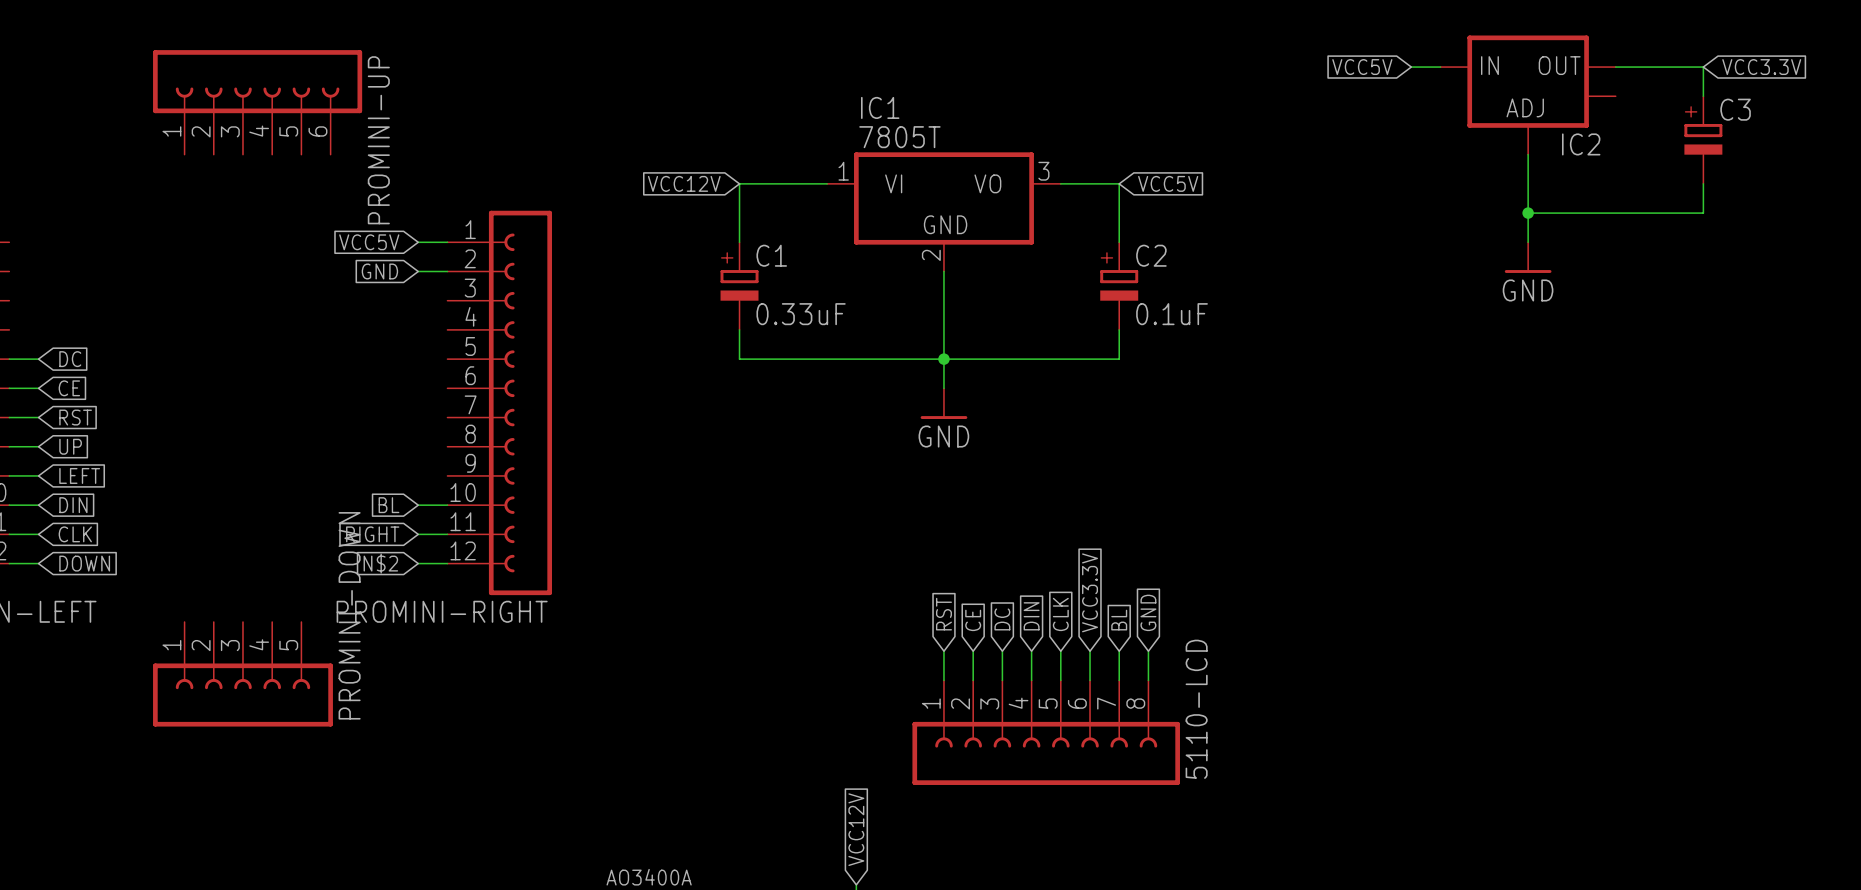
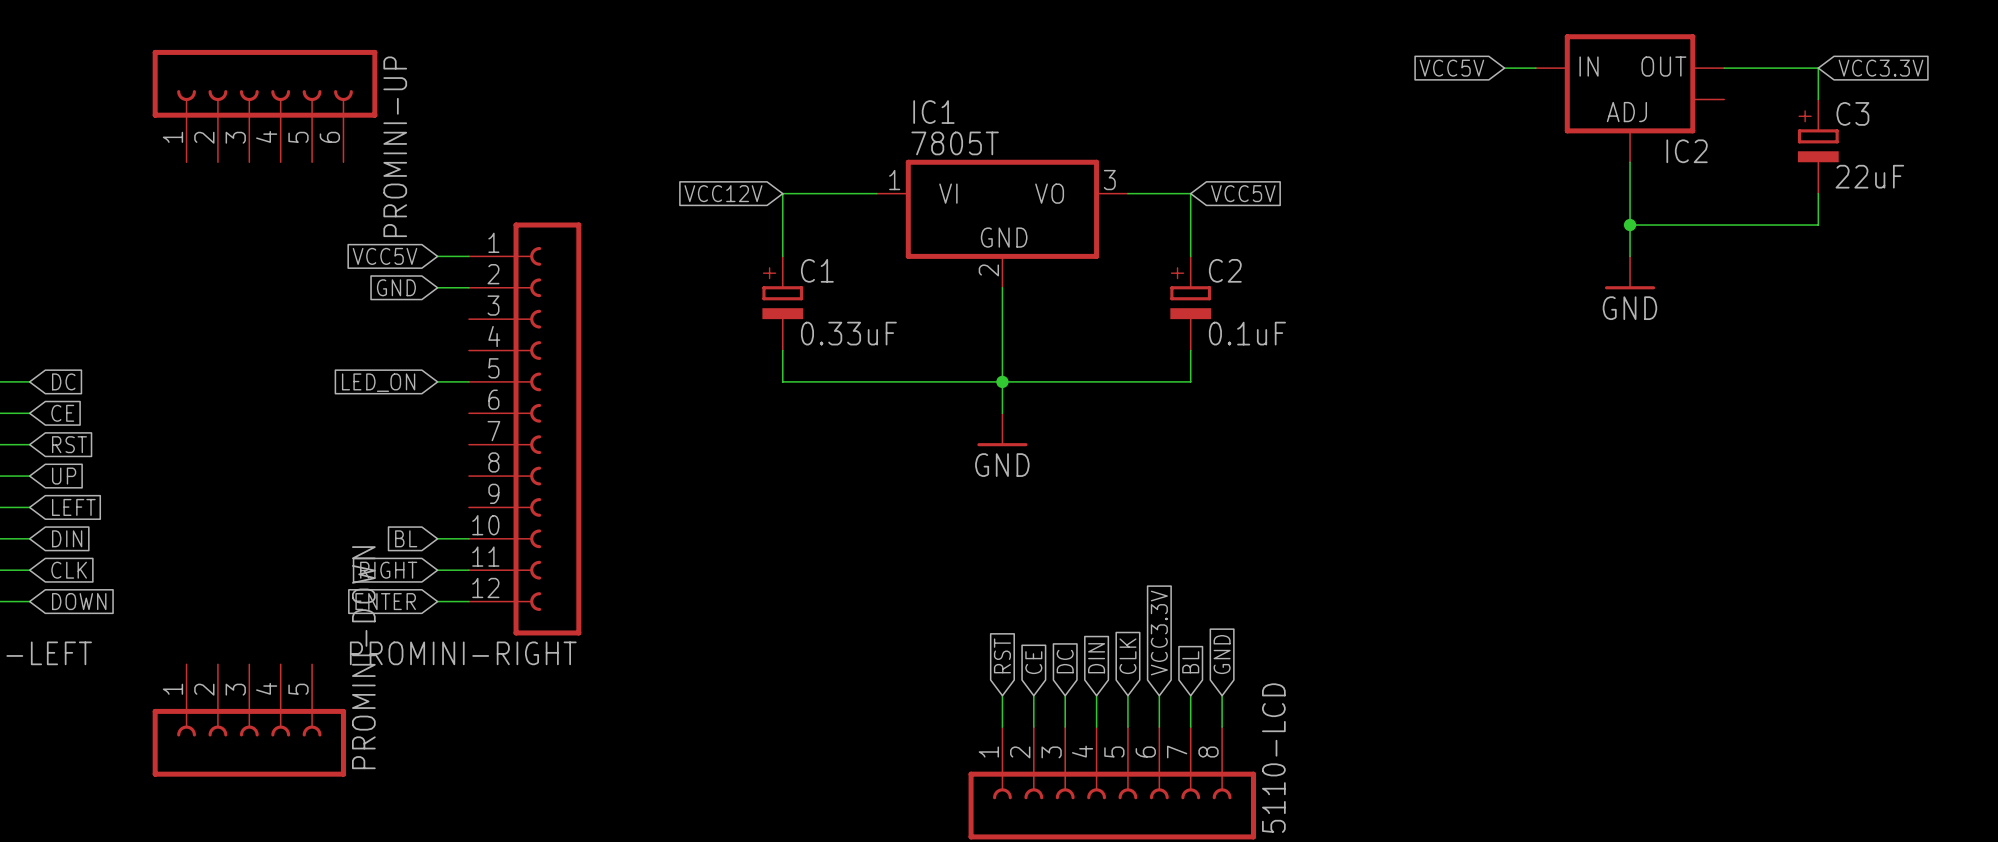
C3 value: none -> 22uF (1869, 176)
global label: none -> LED_ON (378, 382)
wire: none -> (437, 381) (468, 381)
global label: N$2 (380, 563) -> ENTER (385, 601)

